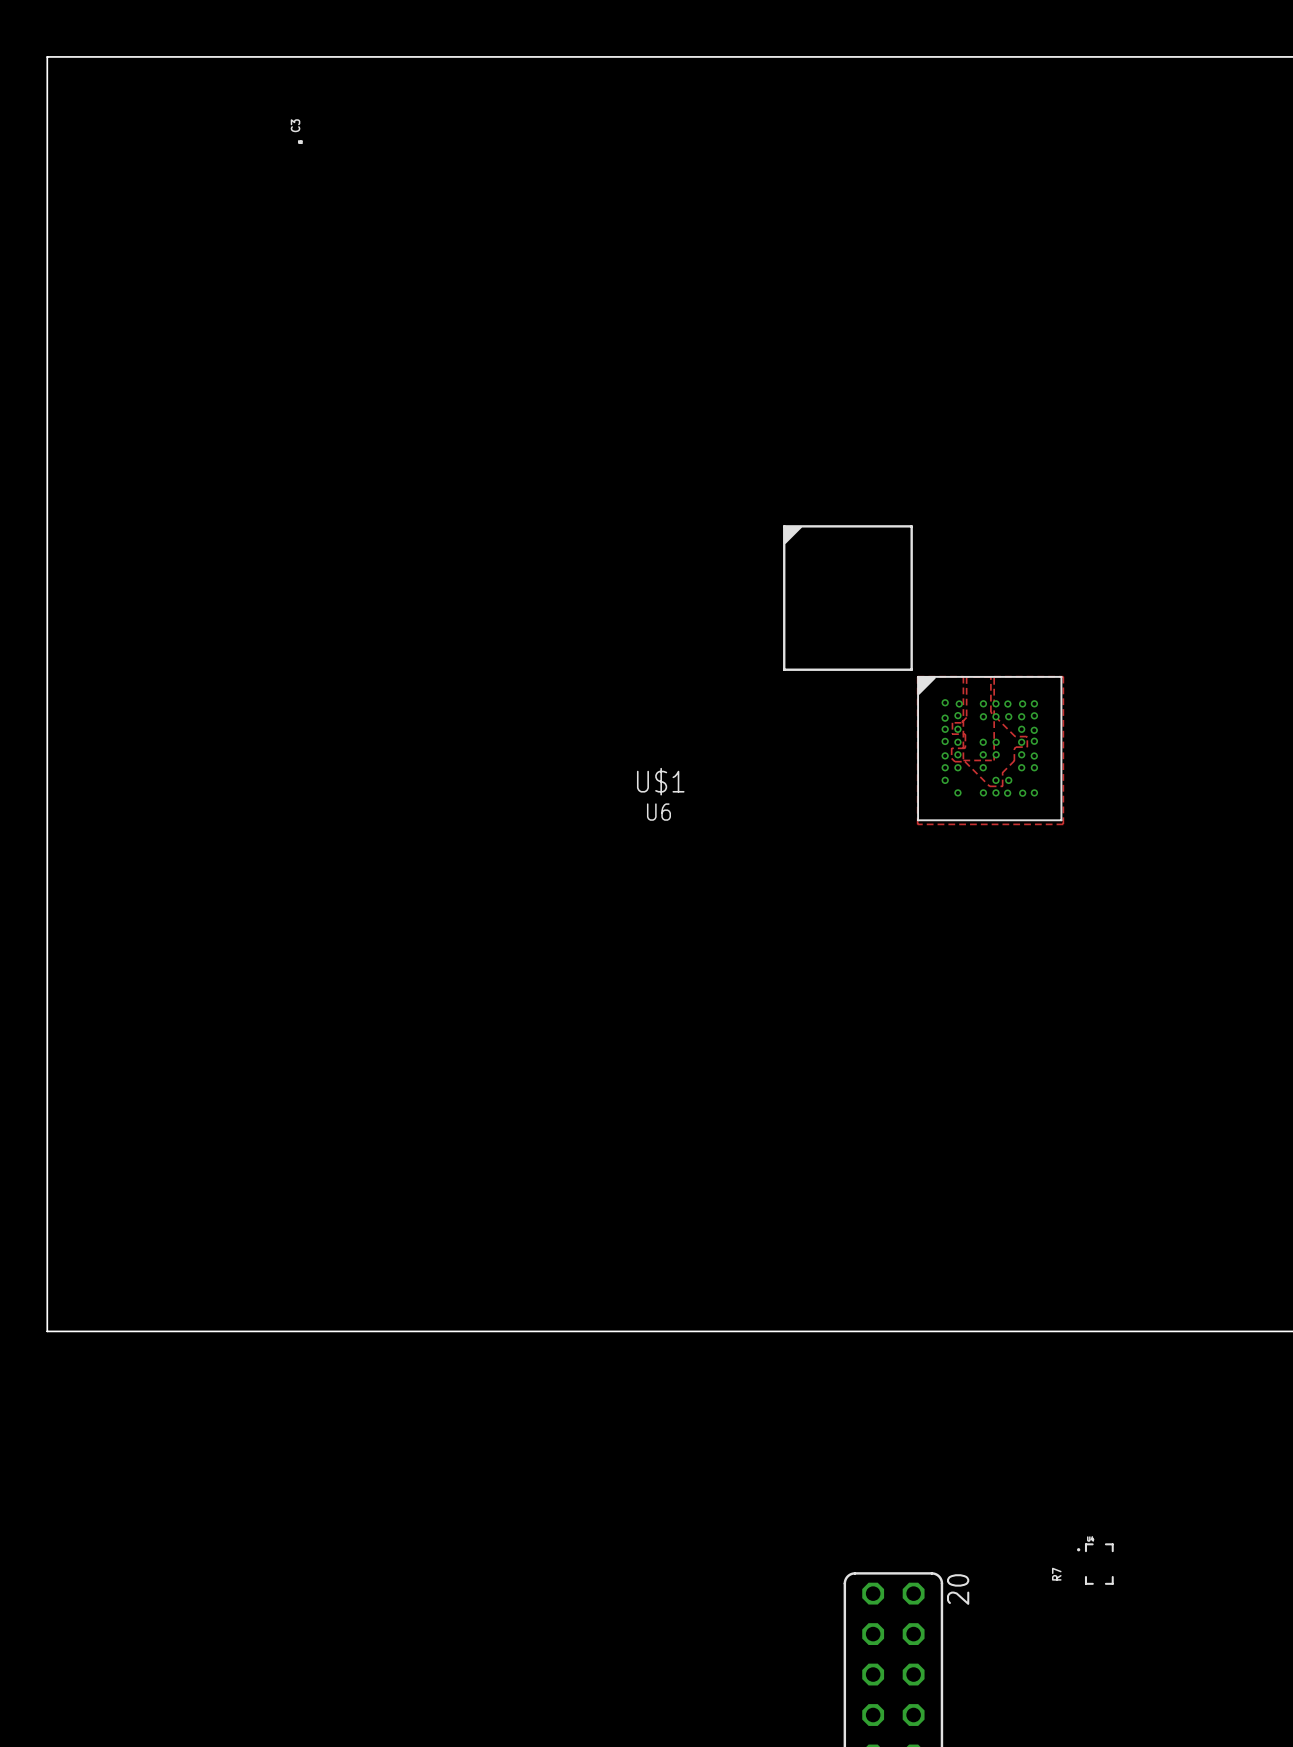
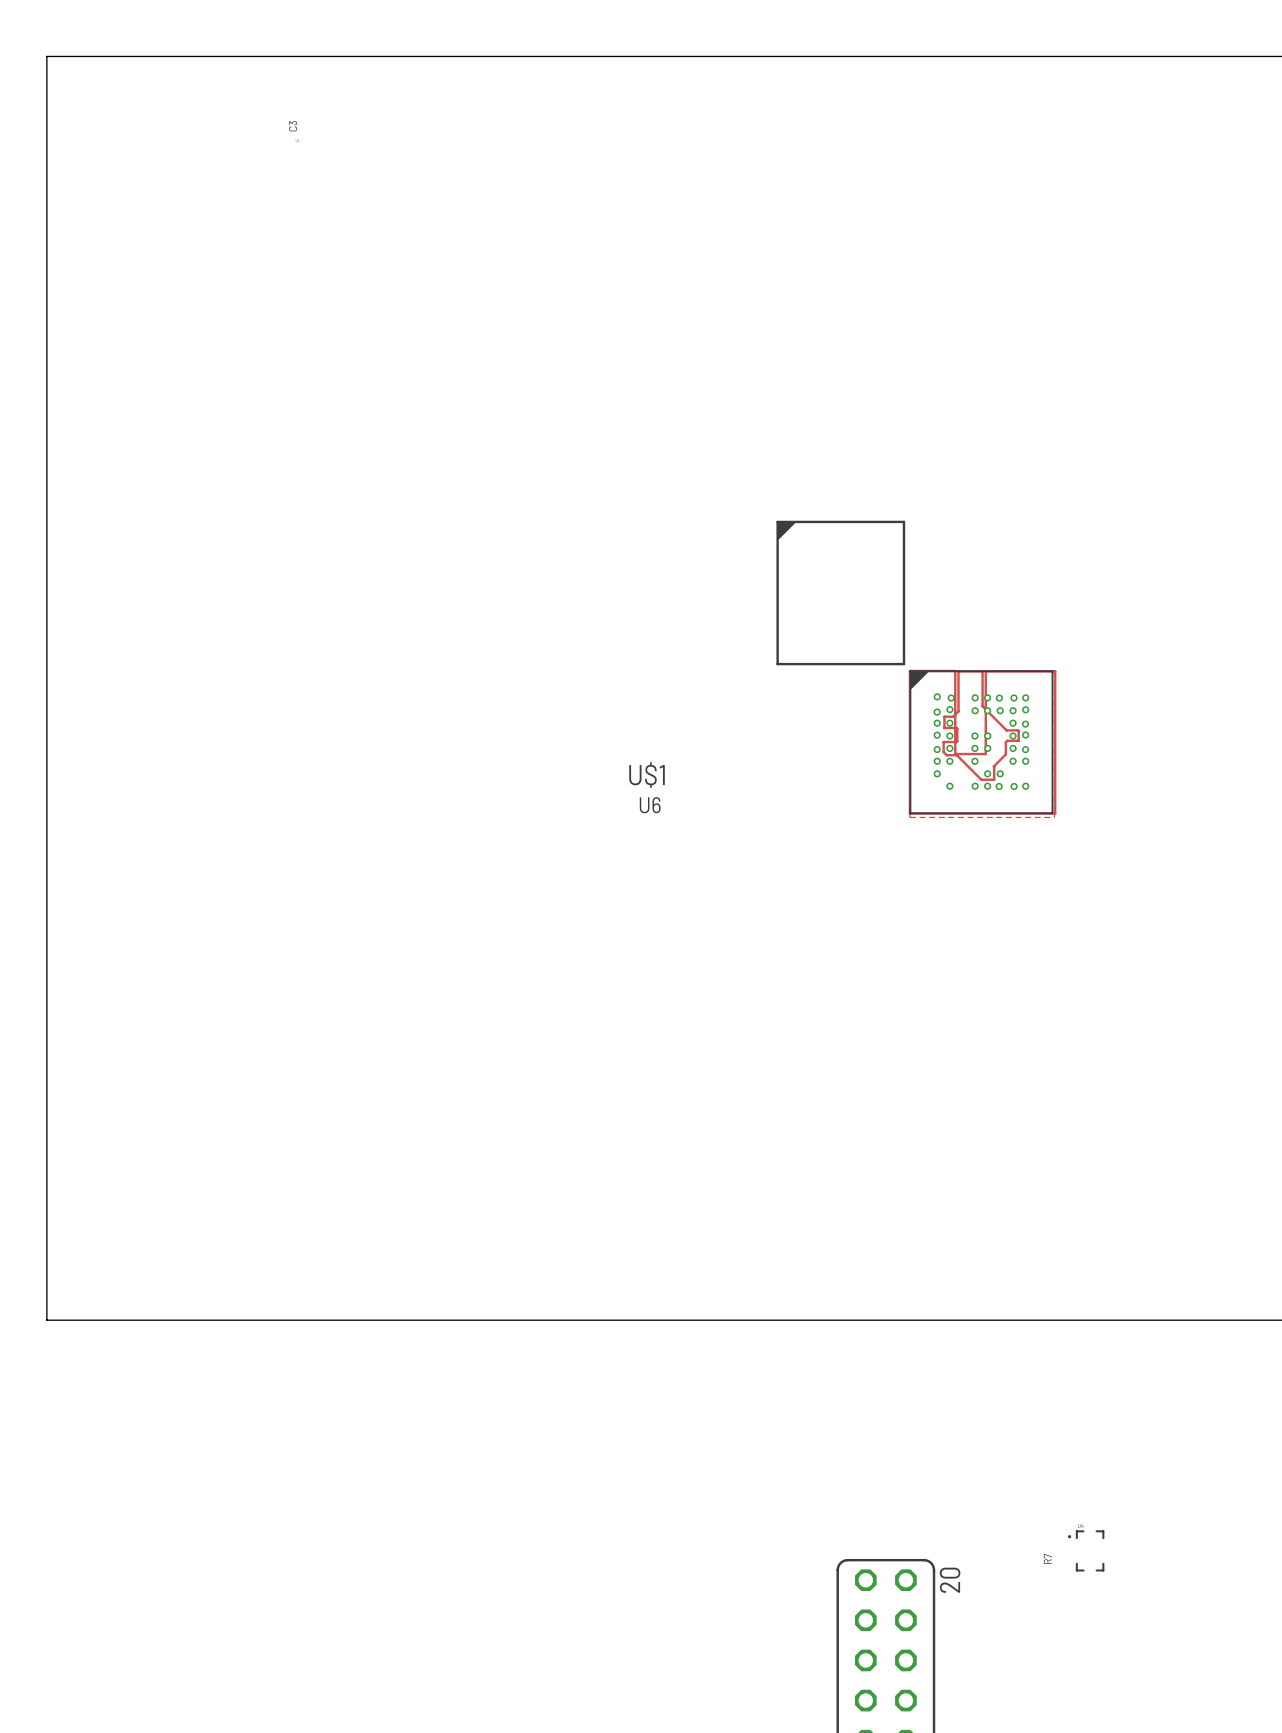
track: none -> (909, 671) (909, 813) (1055, 813) (1055, 671) (985, 671) (985, 754) (955, 754) (955, 671) (909, 671)
zone outline: (966, 677) (990, 677) (990, 712) (1015, 736) (1027, 737) (1027, 747) (1014, 748) (1014, 760) (1002, 773) (1002, 786) (989, 786) (965, 761) (954, 761) (951, 758) (951, 748) (965, 747) (965, 734) (952, 734) (952, 722) (961, 722) (966, 717) (966, 677) -> none
track: none -> (958, 671) (982, 671) (982, 706) (1006, 730) (1018, 731) (1018, 740) (1005, 742) (1005, 754) (993, 766) (994, 779) (981, 779) (956, 755) (946, 755) (943, 752) (943, 742) (957, 741) (957, 728) (944, 727) (944, 716) (953, 716) (958, 711) (958, 671)

